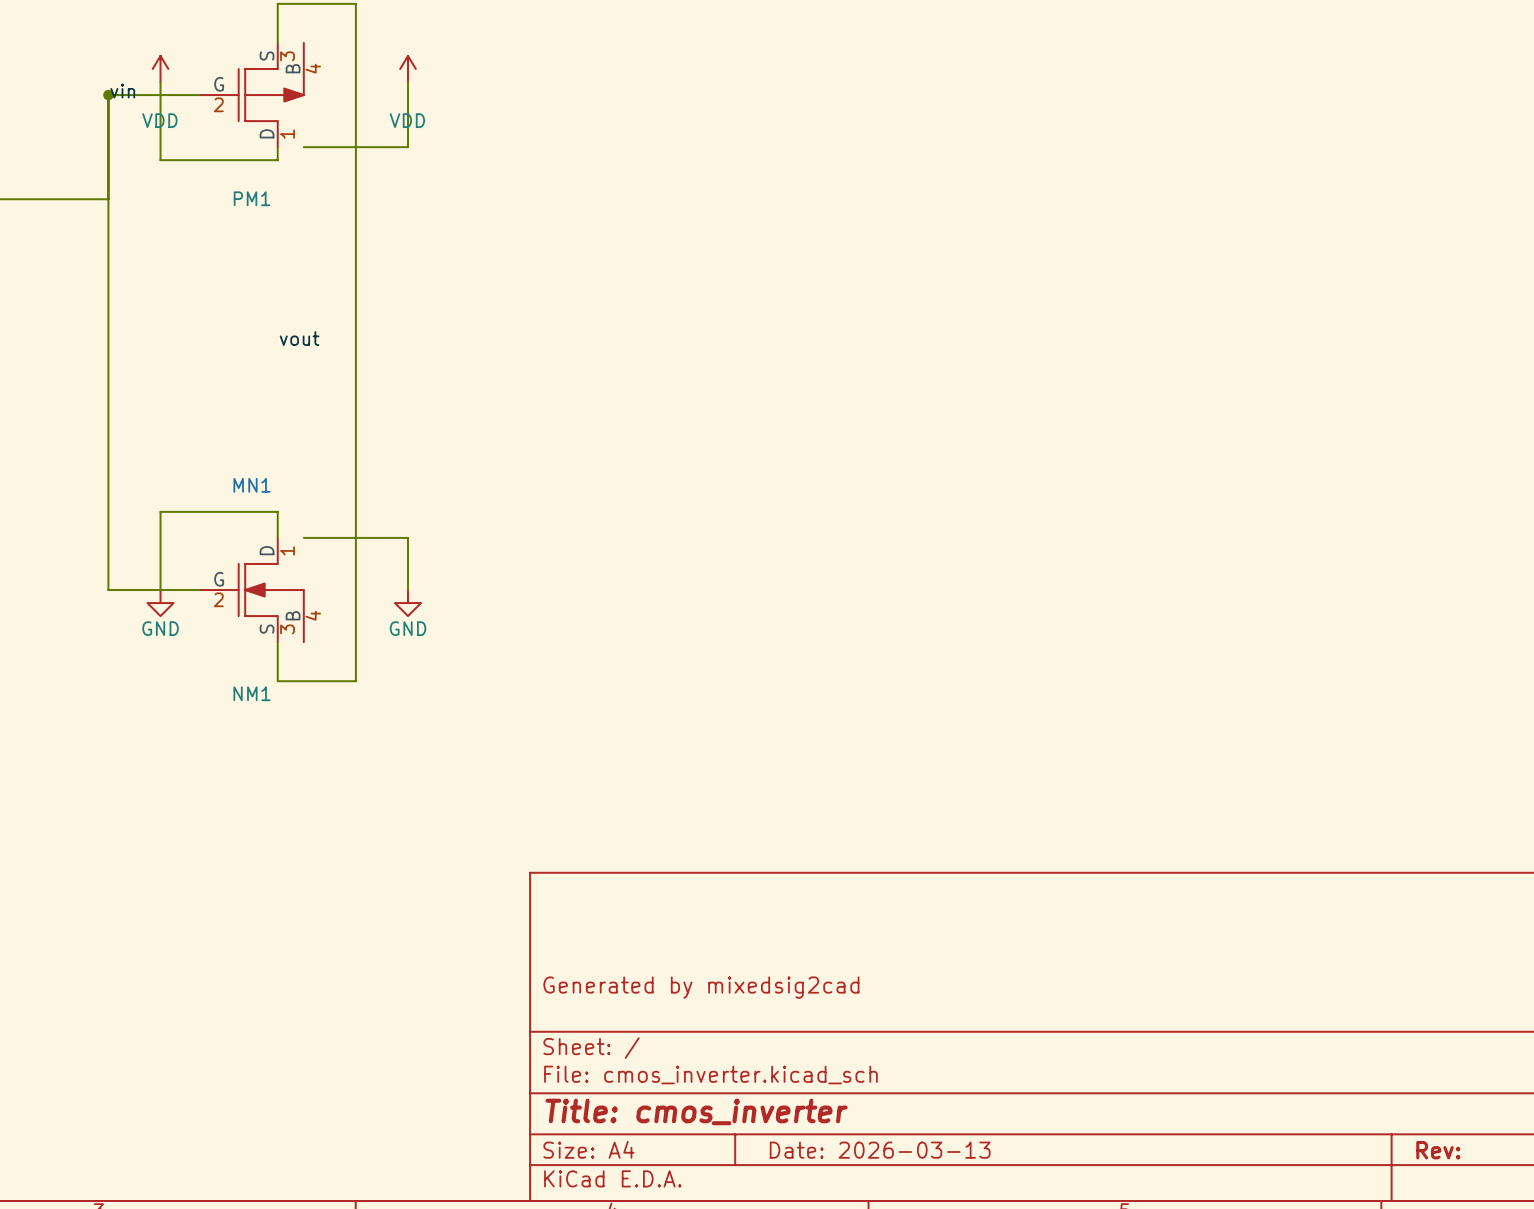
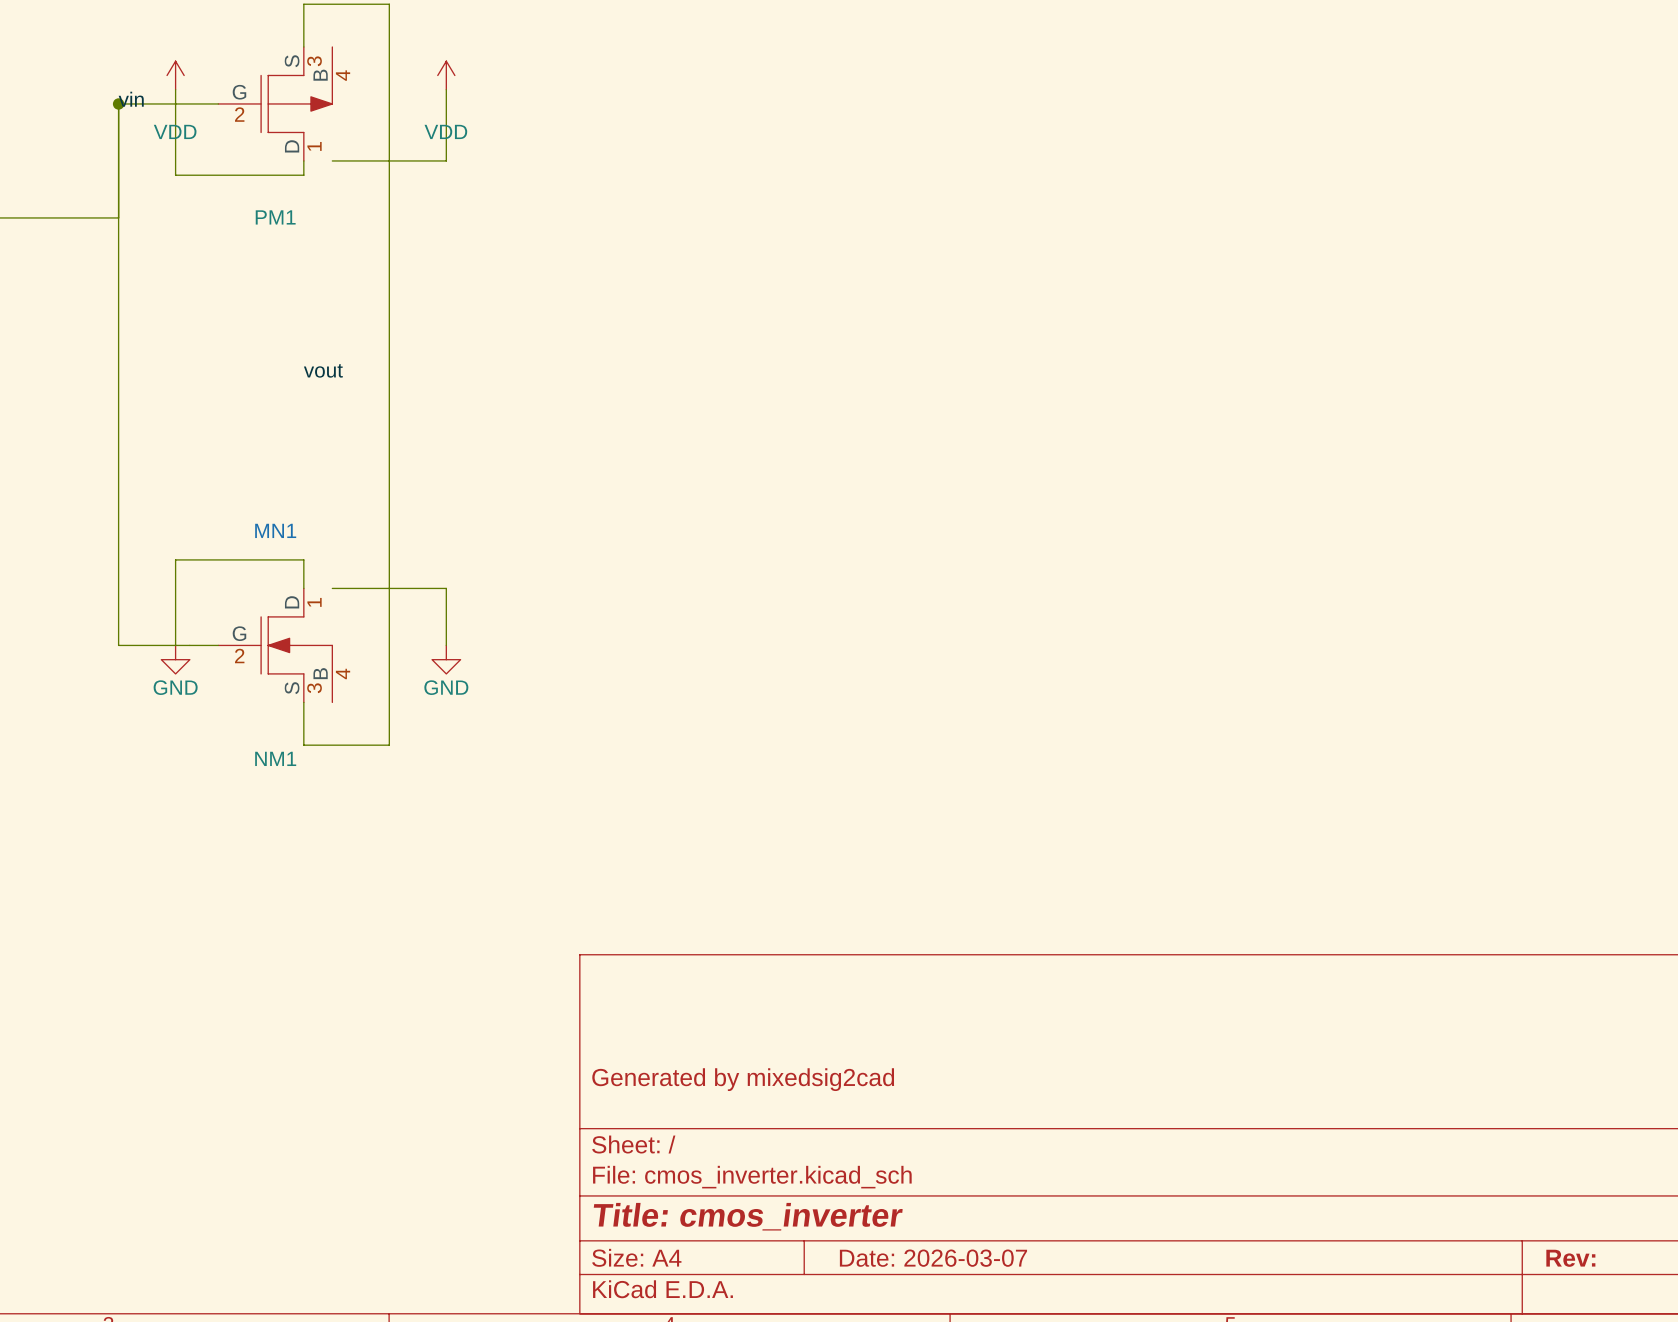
title block: Date: 2026-03-13 (880, 1150) -> Date: 2026-03-07 (933, 1258)

